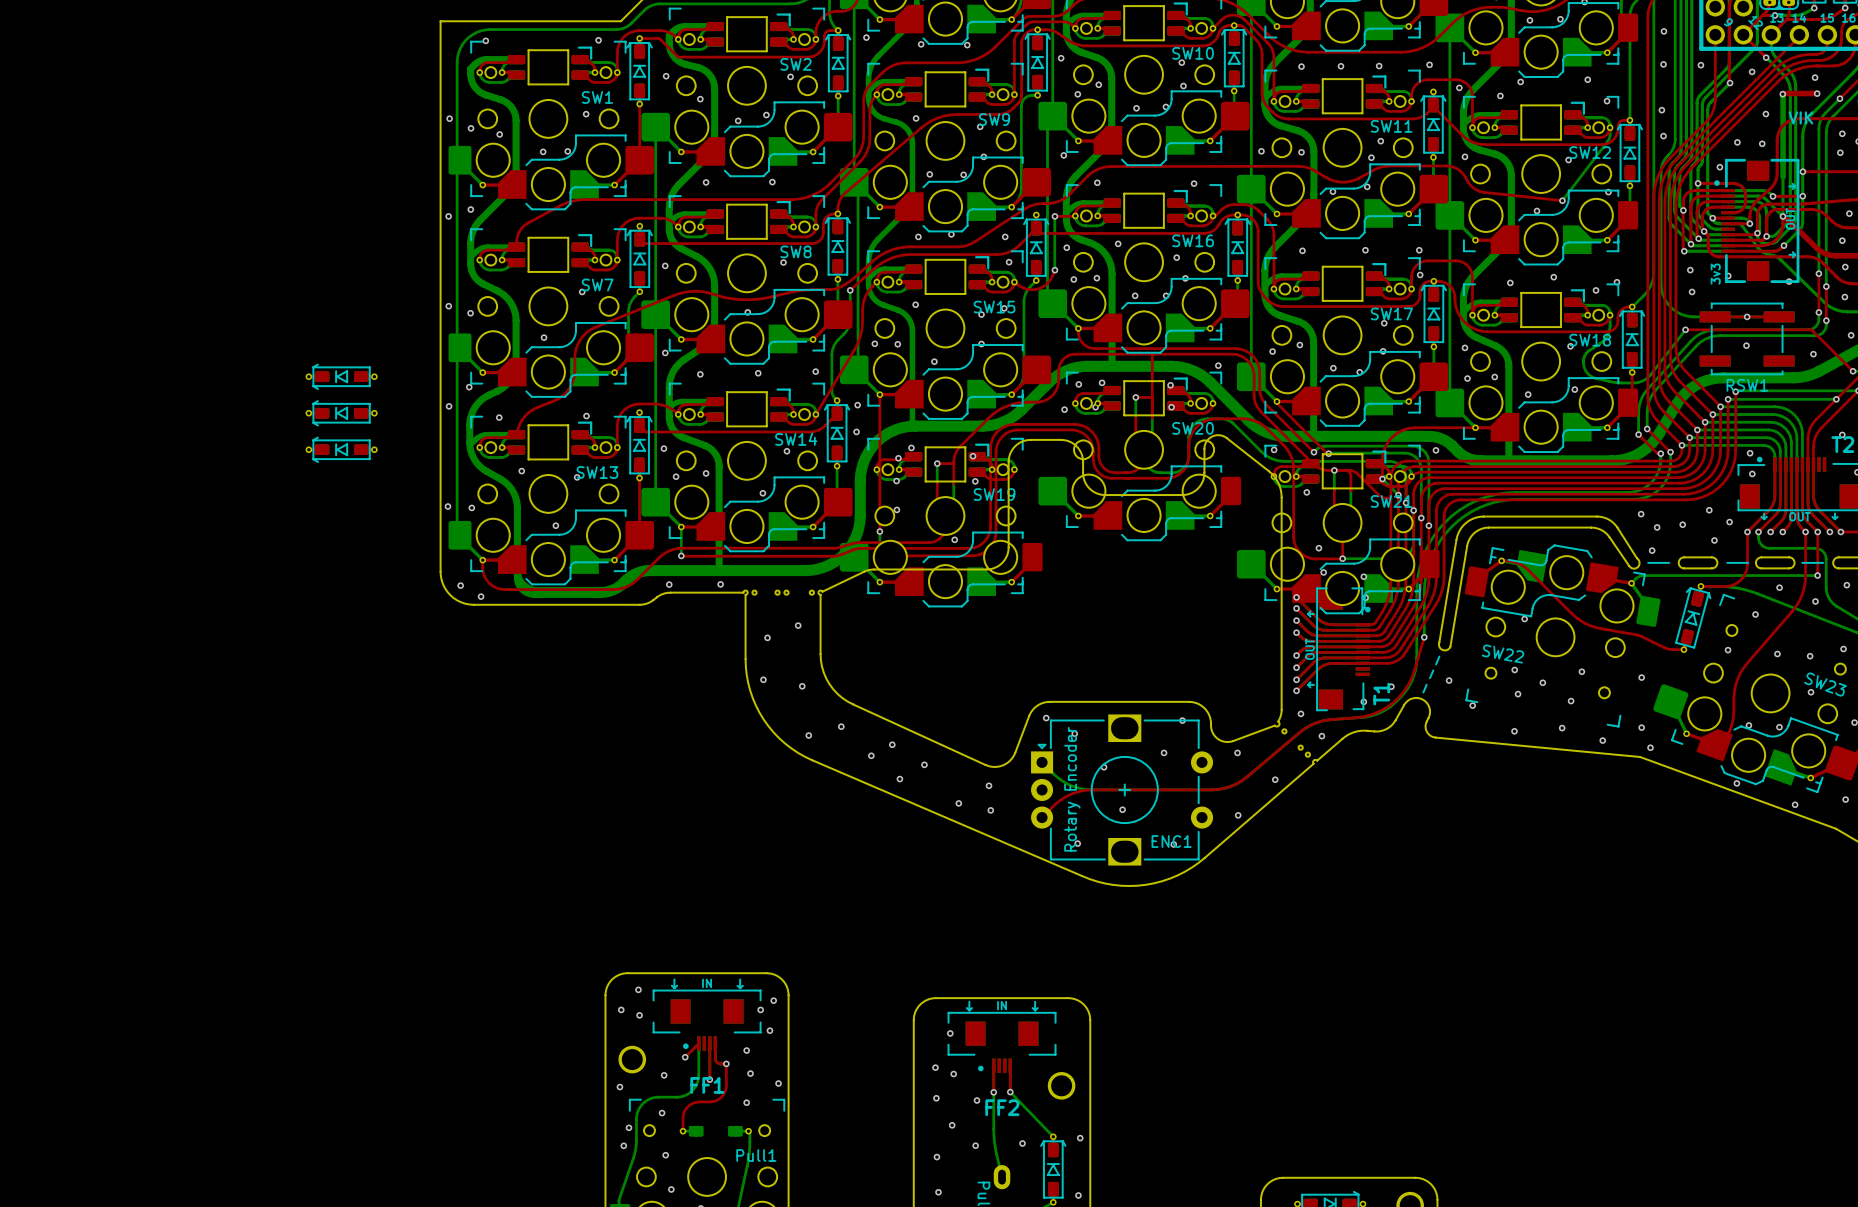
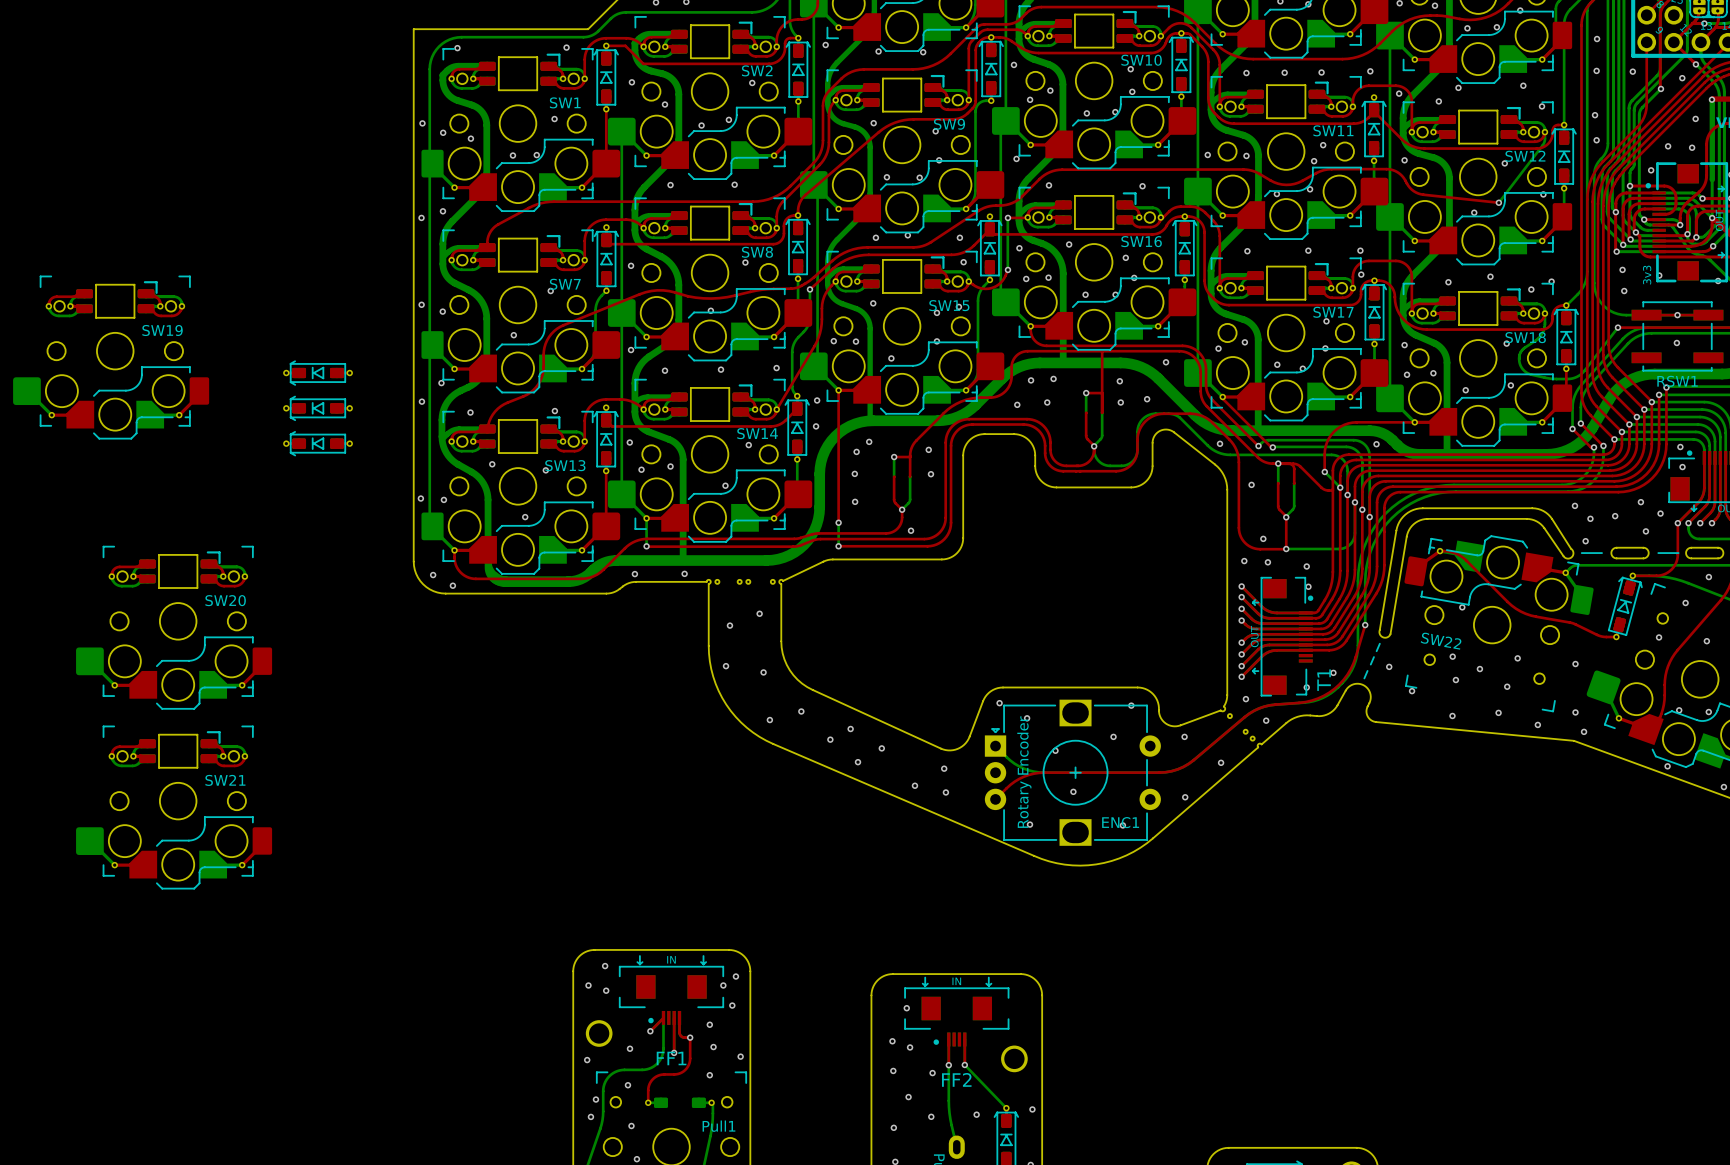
SW20 position: (1139, 456) -> (174, 627)
SW19 position: (941, 522) -> (111, 357)
SW21 position: (1338, 529) -> (174, 807)

